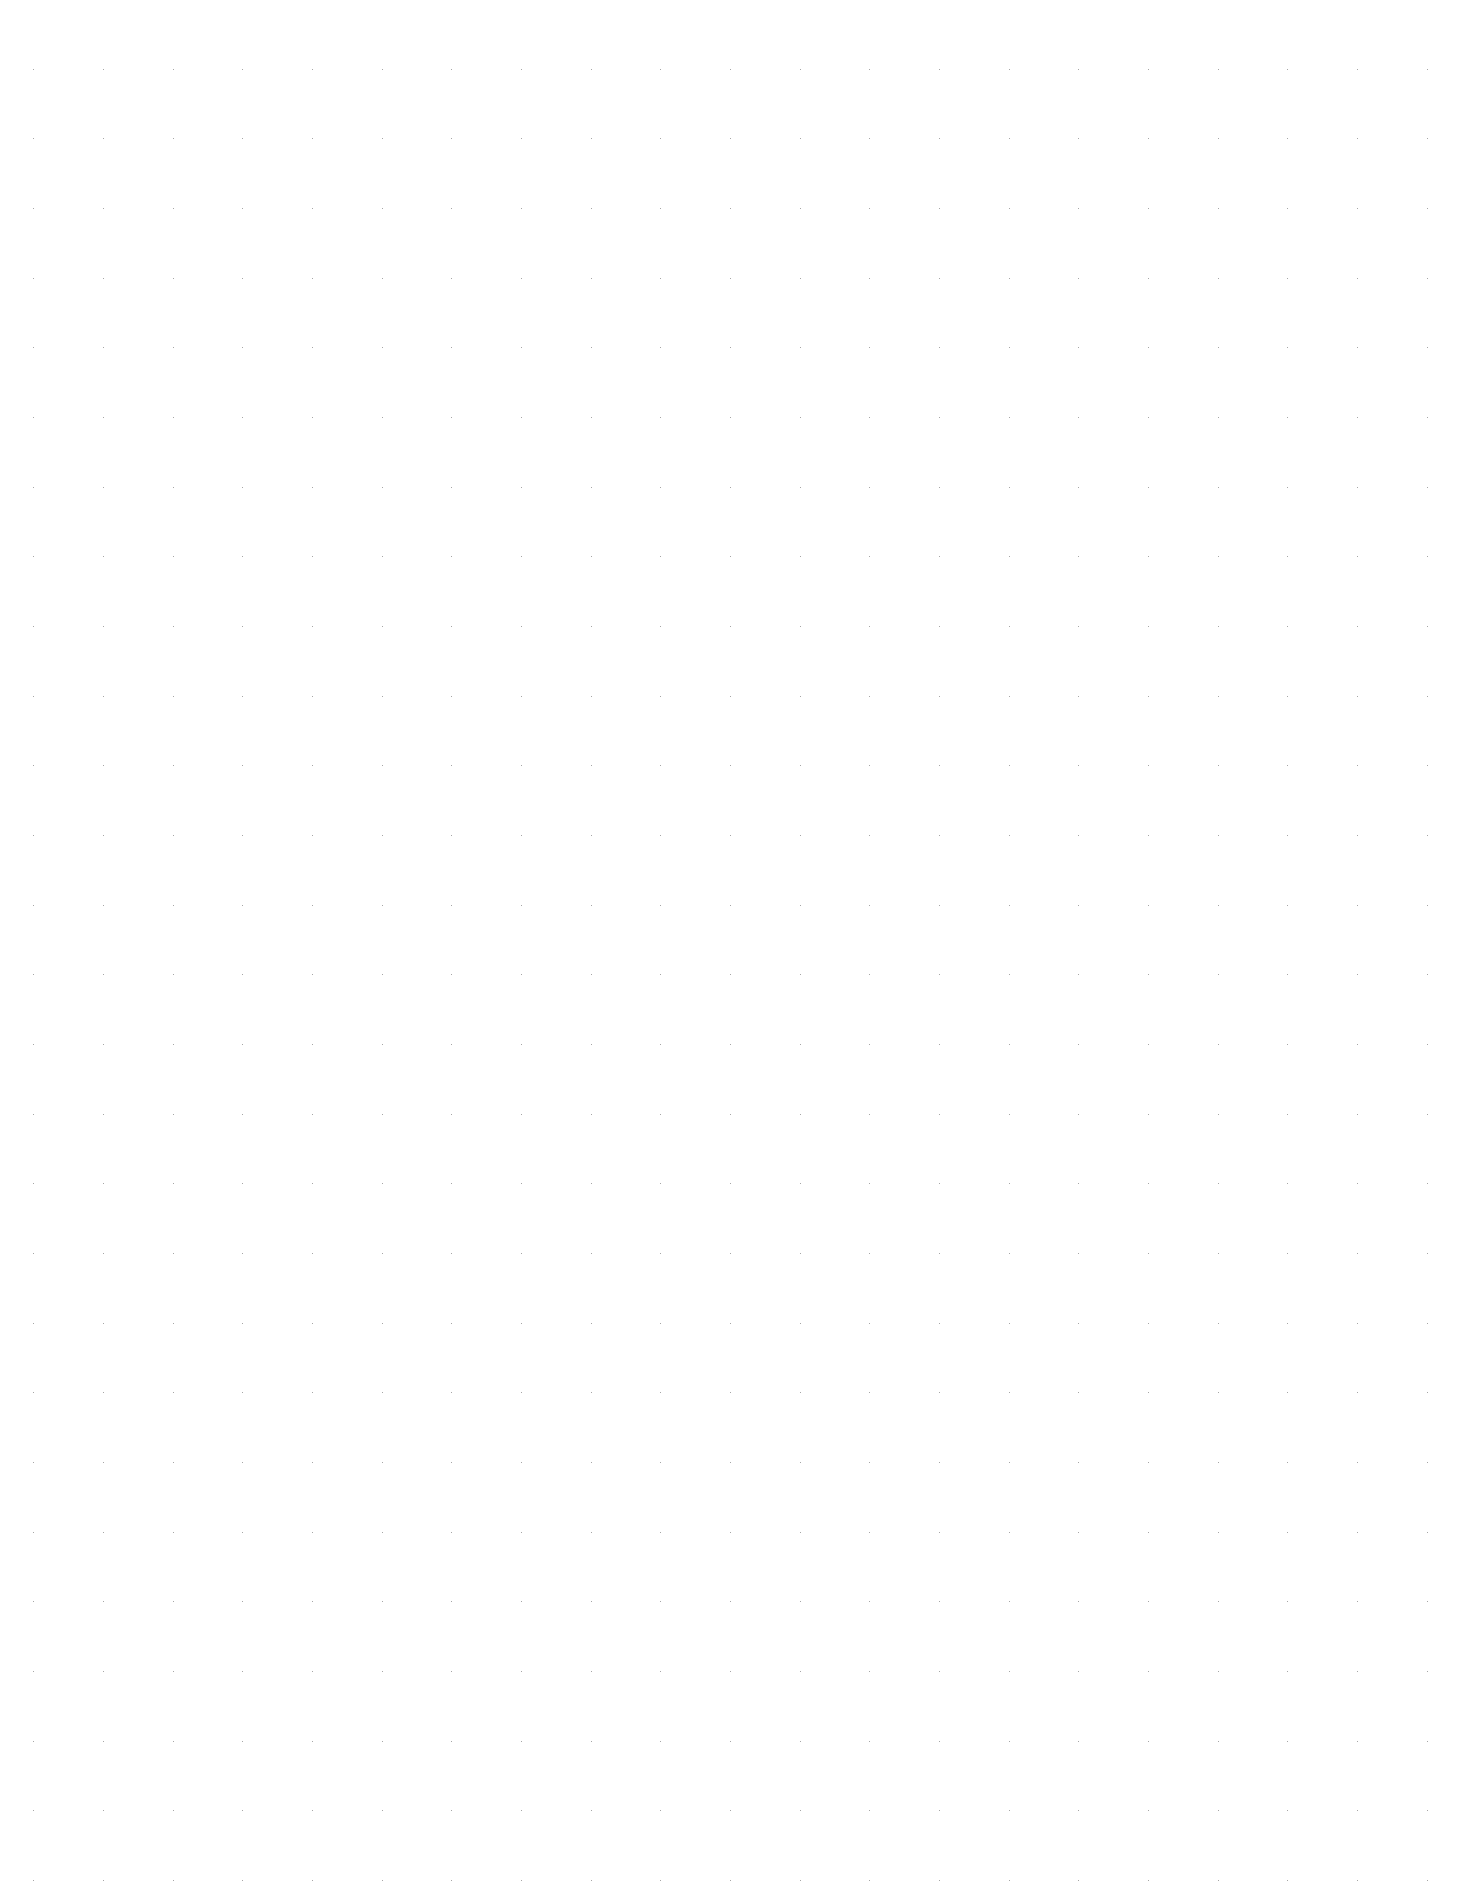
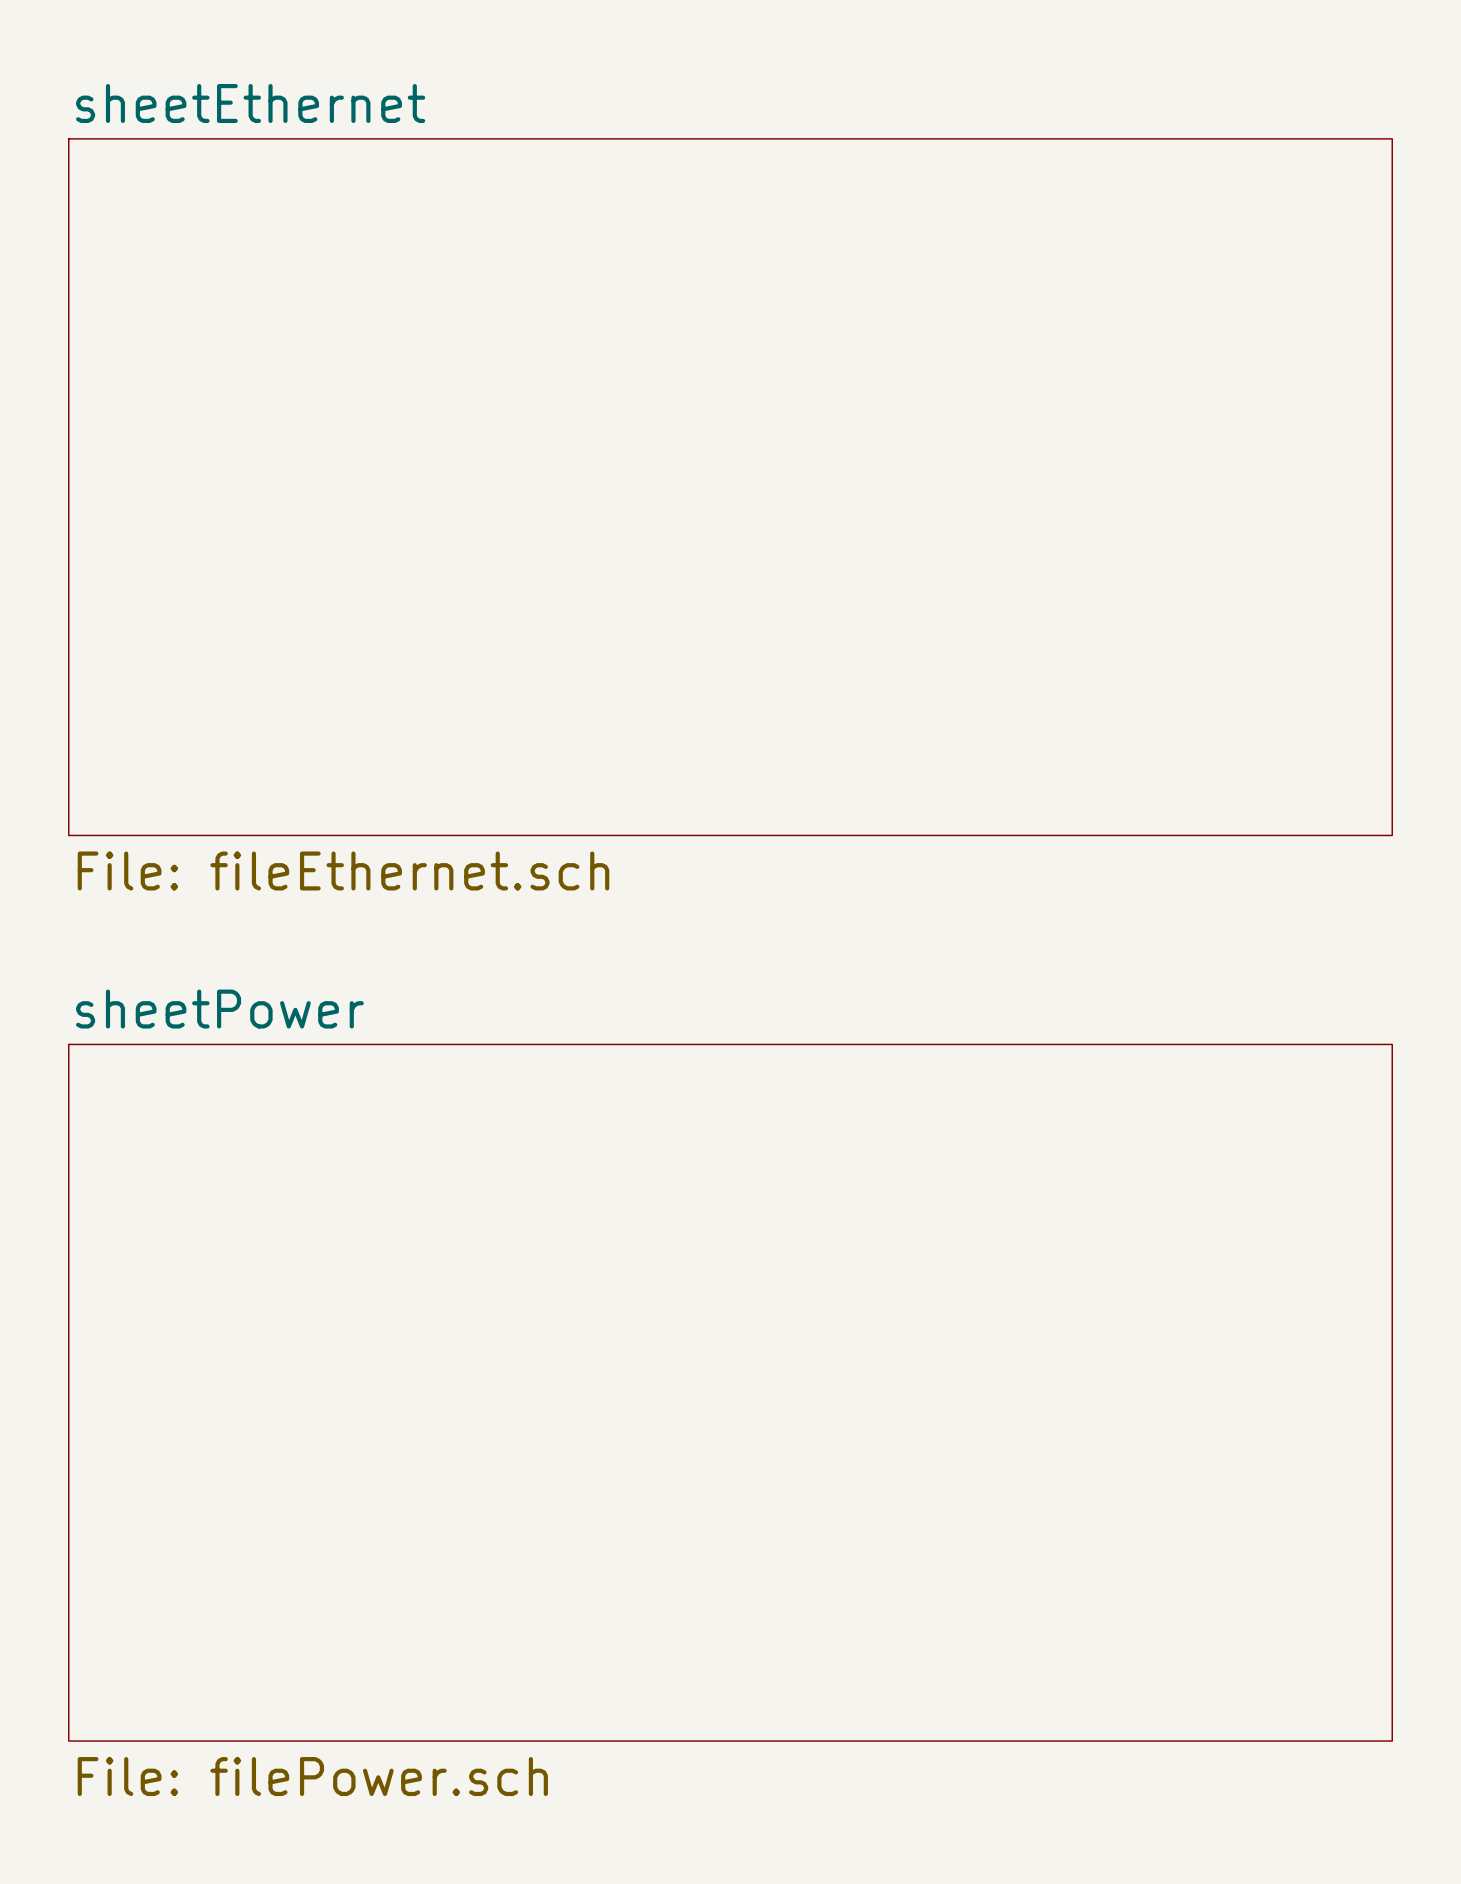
sheet sheetEthernet: none -> File: fileEthernet.sch (730, 487)
sheet sheetPower: none -> File: filePower.sch (730, 1392)

